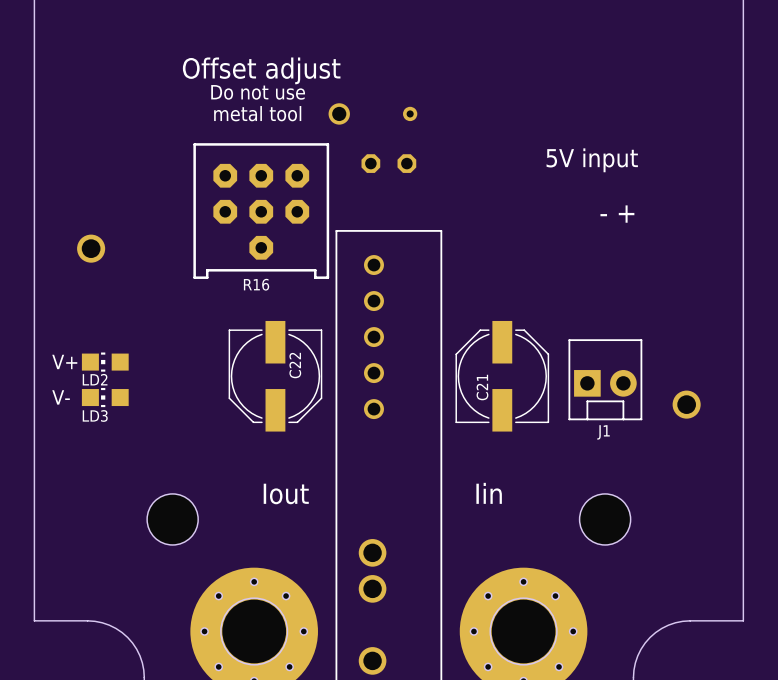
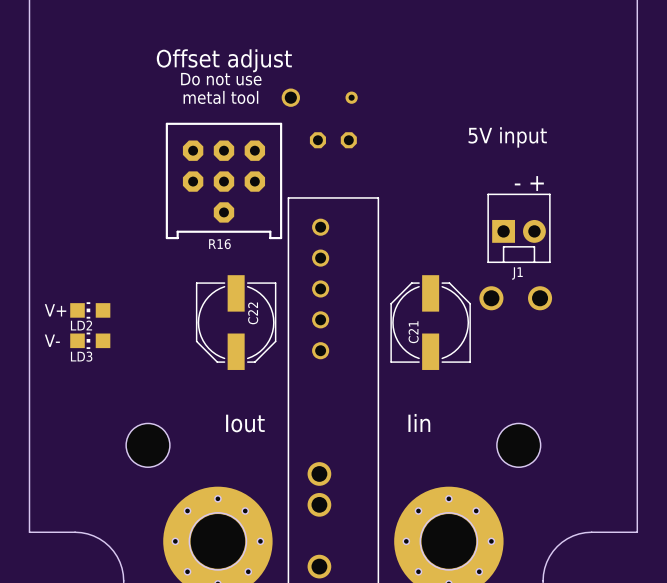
part: (91, 248) -> none
part: none -> (491, 298)
part: none -> (540, 298)
J1 position: (605, 379) -> (519, 228)
part: (686, 404) -> none

